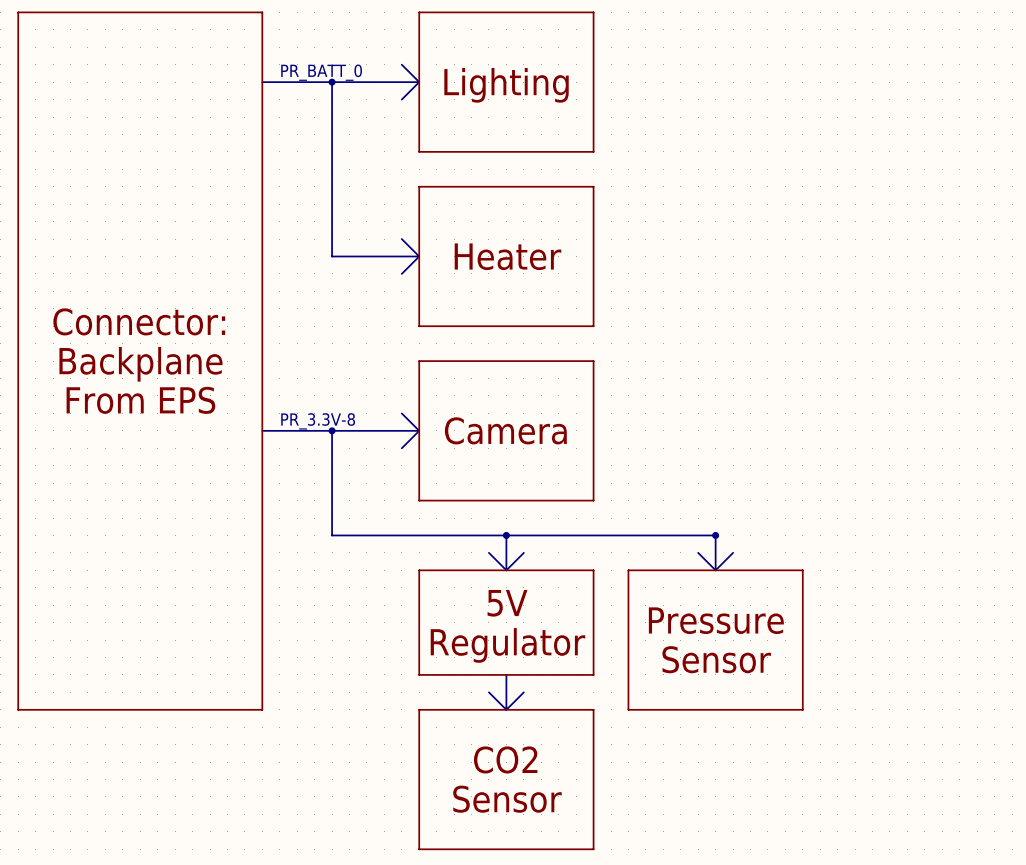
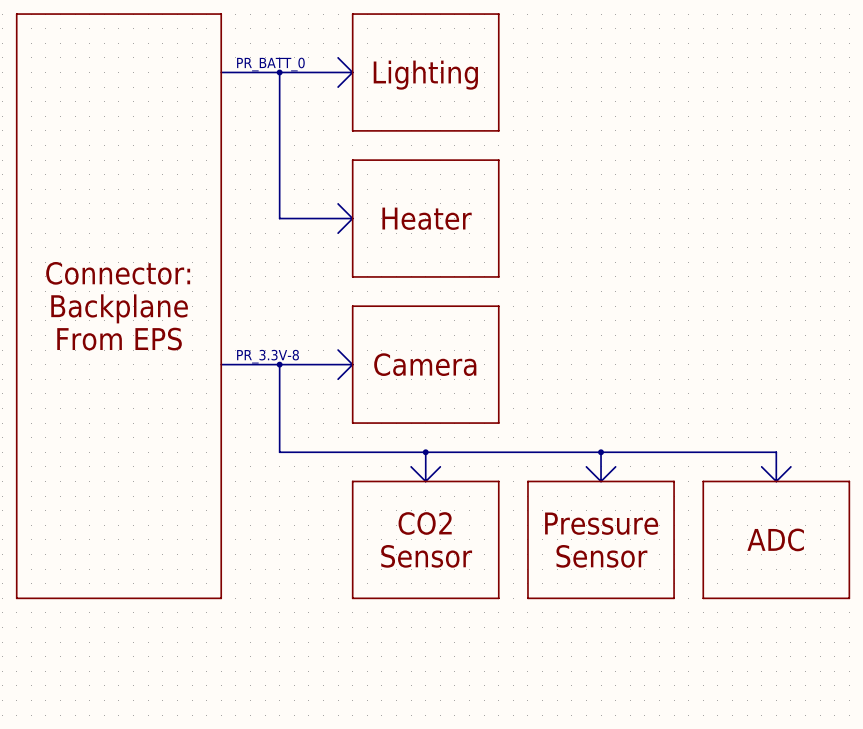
line: none -> (601, 452) (776, 452) (776, 481)
line: none -> (761, 466) (776, 481)
line: none -> (790, 466) (776, 481)
line: none -> (703, 481) (849, 481) (849, 598) (703, 598) (703, 481)
text: 5V (507, 603) -> none
text: none -> ADC (775, 539)
text: Regulator (507, 645) -> none
line: (419, 674) (593, 674) -> (352, 569) (352, 598)
line: (506, 674) (506, 709) -> none
line: (488, 692) (506, 709) -> none
line: (523, 692) (506, 709) -> none
line: (419, 709) (419, 849) (593, 849) (593, 709) -> (498, 569) (498, 598)
text position: CO2 (505, 759) -> CO2 (425, 523)
text position: Sensor (507, 799) -> Sensor (426, 556)

